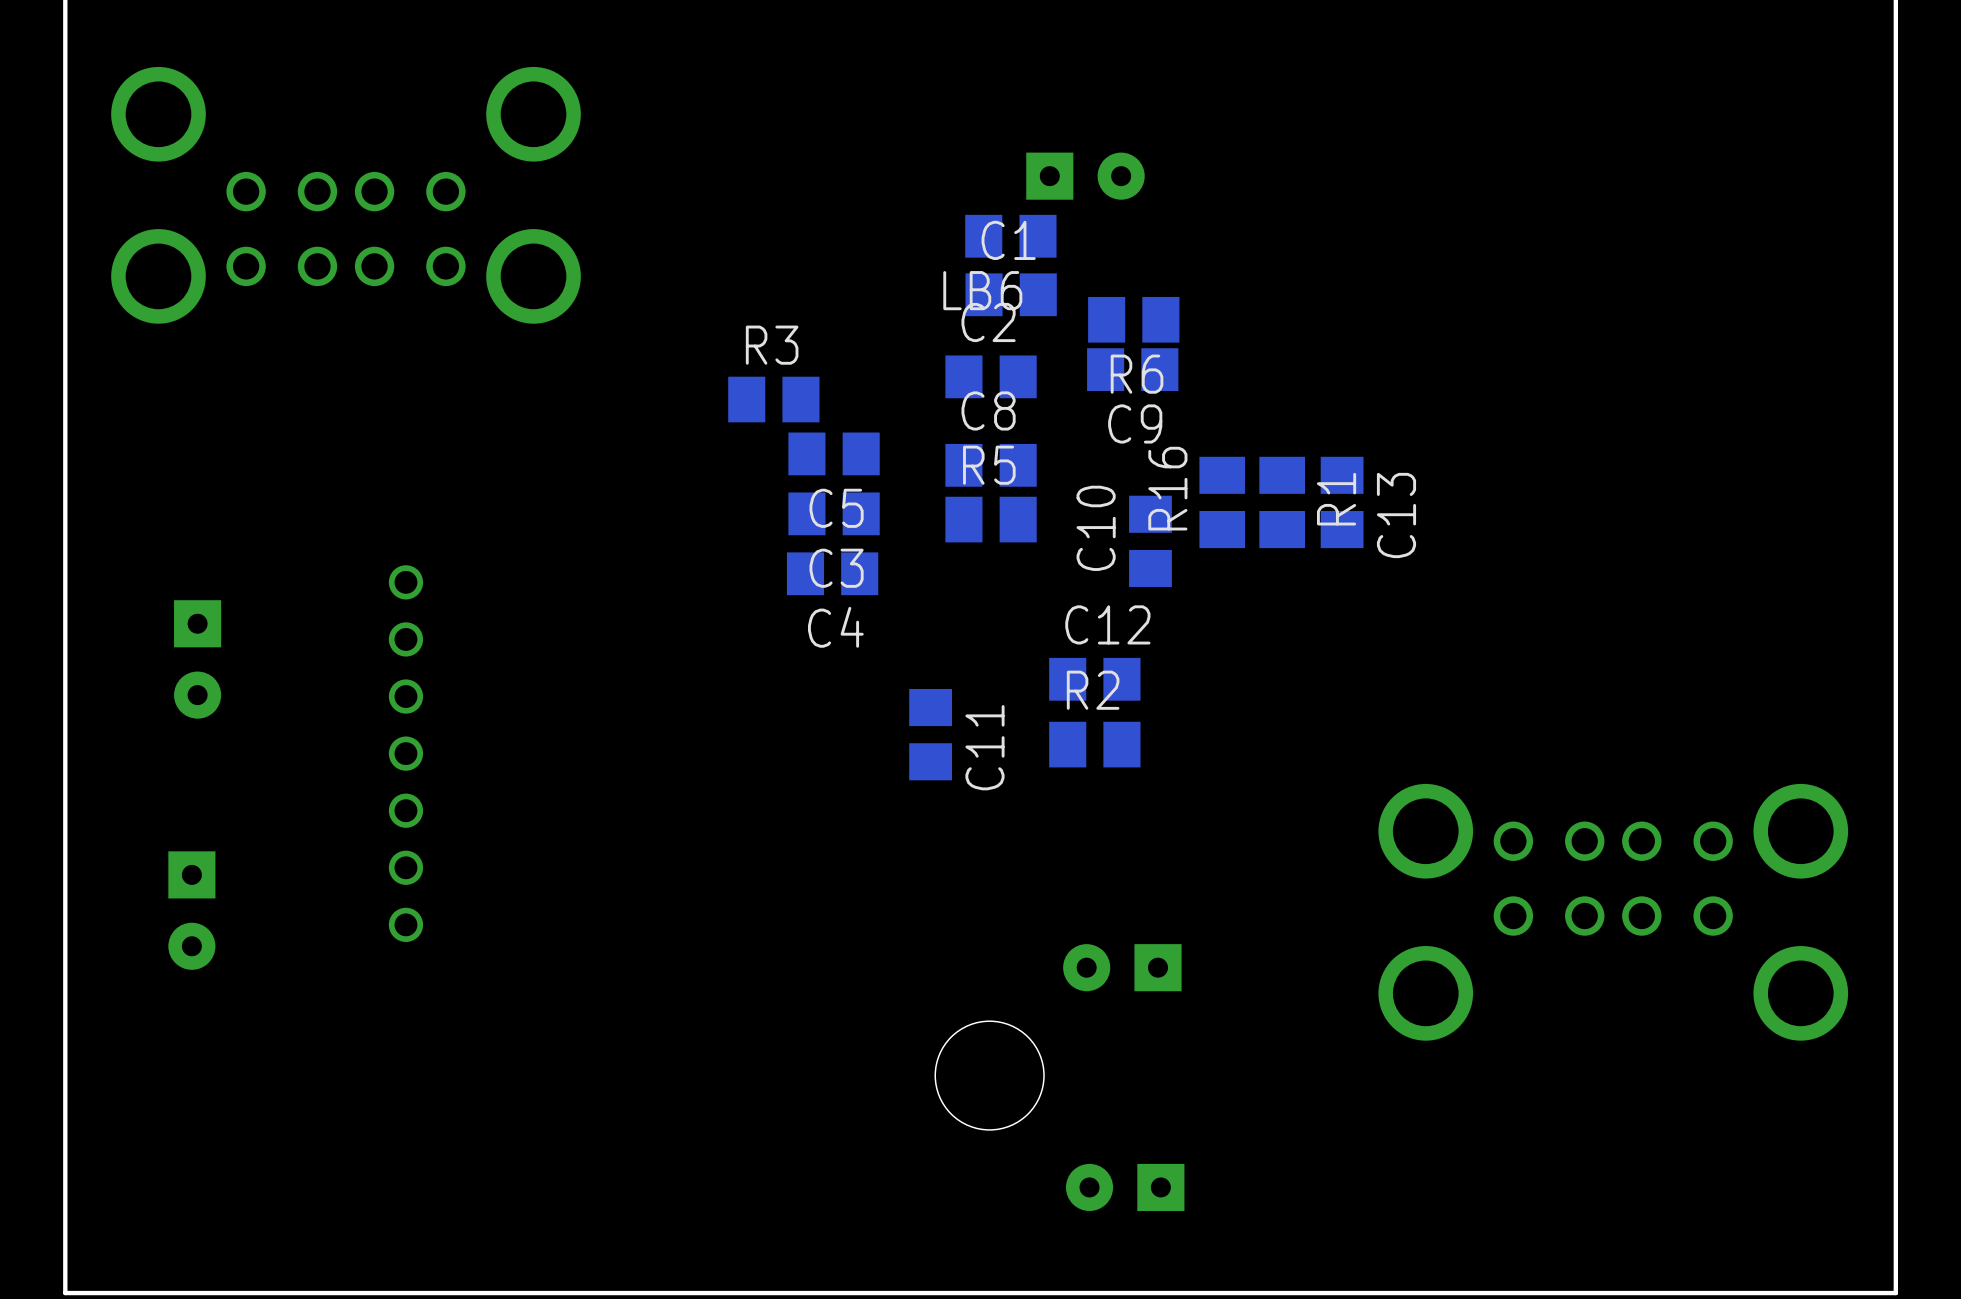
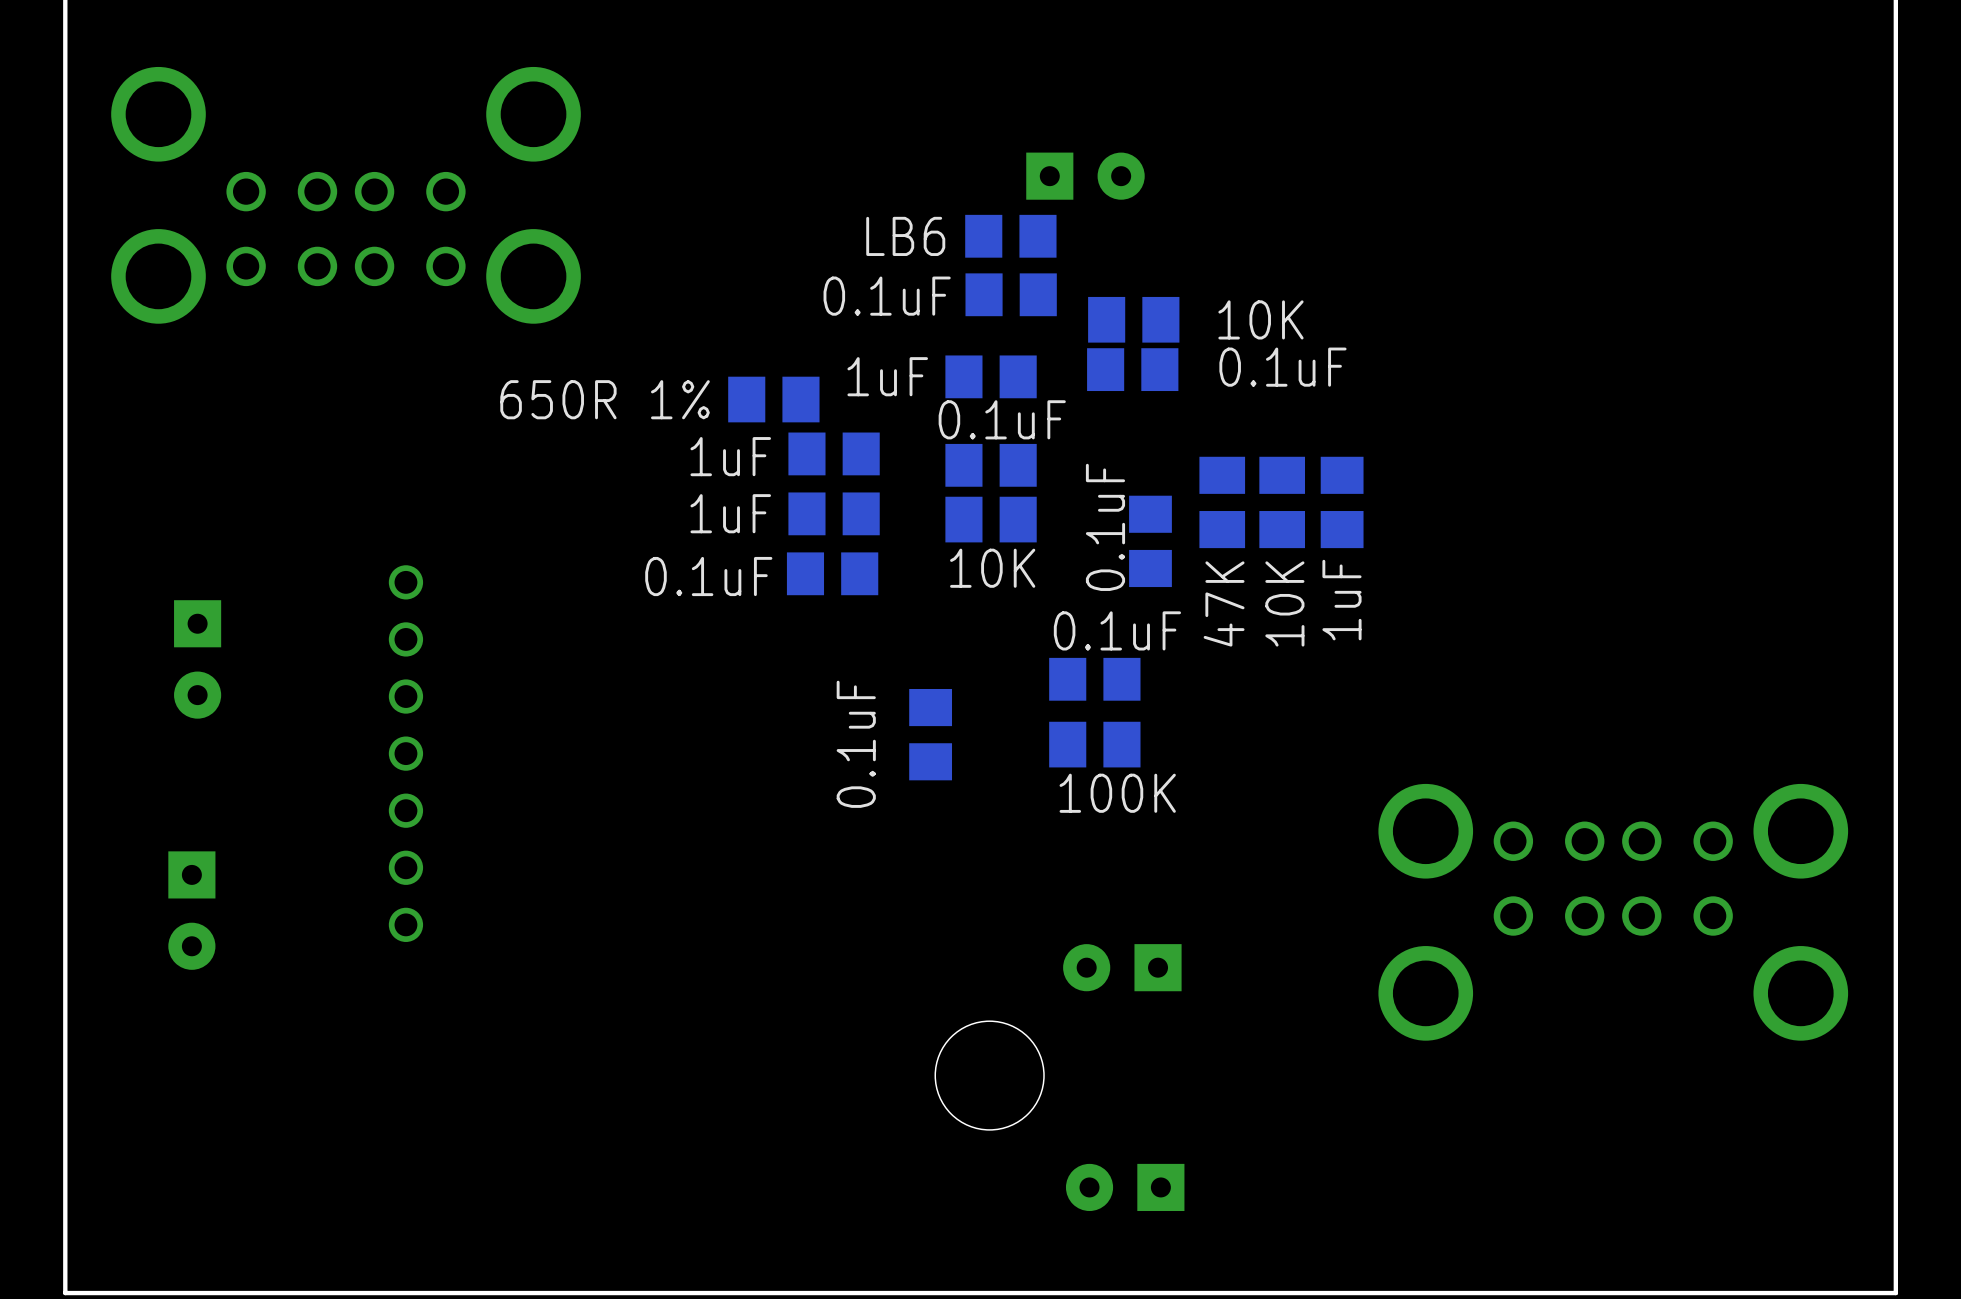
C1 name: C1 (1008, 240) -> none
LB6 name position: LB6 (982, 290) -> LB6 (905, 236)
C1 value: none -> 0.1uF (887, 296)
R6 value: none -> 10K (1260, 319)
C2 name: C2 (988, 322) -> none
R3 name: R3 (772, 345) -> none
C9 value: none -> 0.1uF (1282, 367)
R6 name: R6 (1137, 374) -> none
C2 value: none -> 1uF (887, 376)
R3 value: none -> 650R 1% (605, 399)
C8 name: C8 (988, 410) -> none
C8 value: none -> 0.1uF (1002, 419)
C9 name: C9 (1135, 423) -> none
C5 value: none -> 1uF (730, 456)
R5 name: R5 (989, 465) -> none
R16 name: R16 (1167, 488) -> none
R1 name: R1 (1336, 499) -> none
C5 name: C5 (836, 508) -> none
C3 value: none -> 1uF (730, 513)
C13 name: C13 (1396, 515) -> none
C10 value: none -> 0.1uF (1105, 527)
C10 name: C10 (1096, 528) -> none
C3 name: C3 (836, 568) -> none
R5 value: none -> 10K (992, 568)
C4 value: none -> 0.1uF (708, 576)
C13 value: none -> 1uF (1341, 600)
R16 value: none -> 47K (1224, 603)
R1 value: none -> 10K (1284, 603)
C12 name: C12 (1107, 624) -> none
C4 name: C4 (835, 627) -> none
C12 value: none -> 0.1uF (1117, 630)
R2 name: R2 (1093, 690) -> none
C11 value: none -> 0.1uF (856, 744)
C11 name: C11 (984, 747) -> none
R2 value: none -> 100K (1117, 793)

